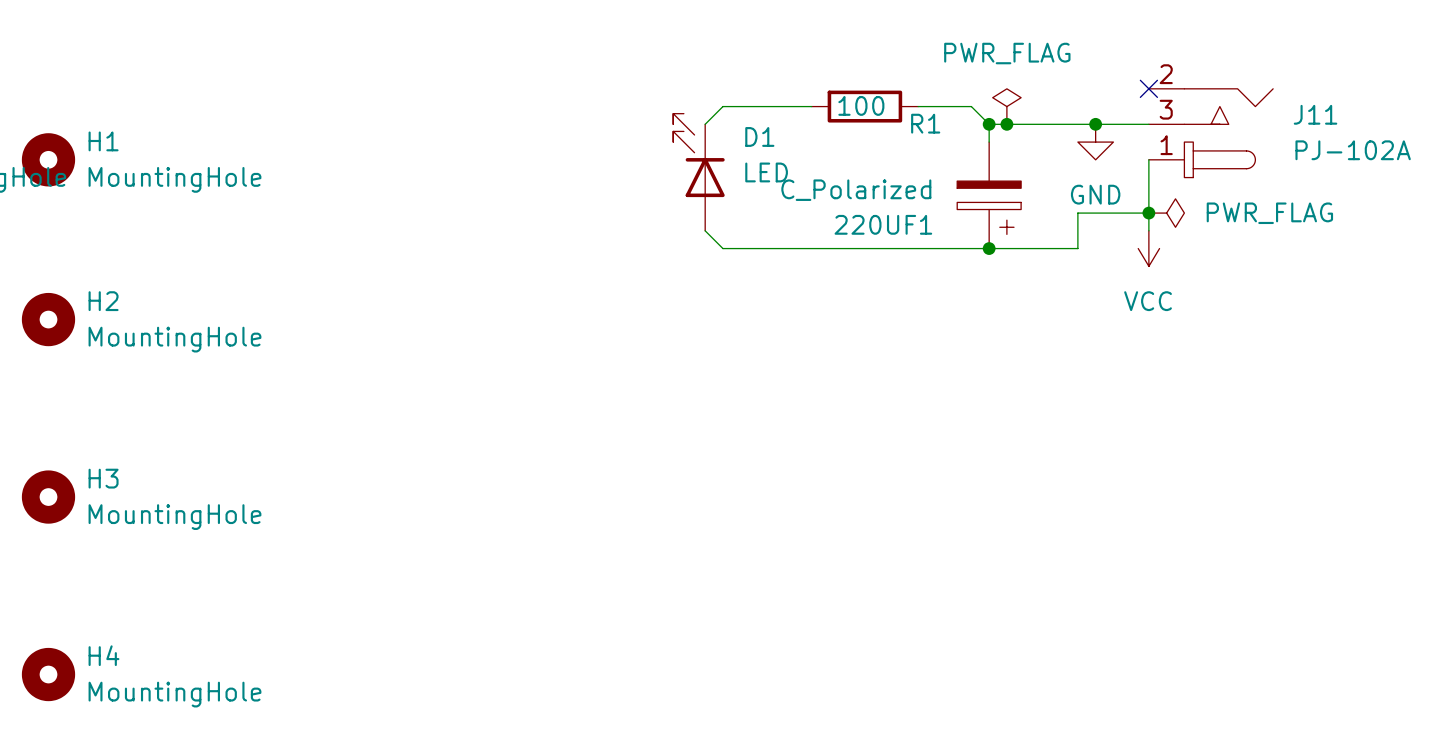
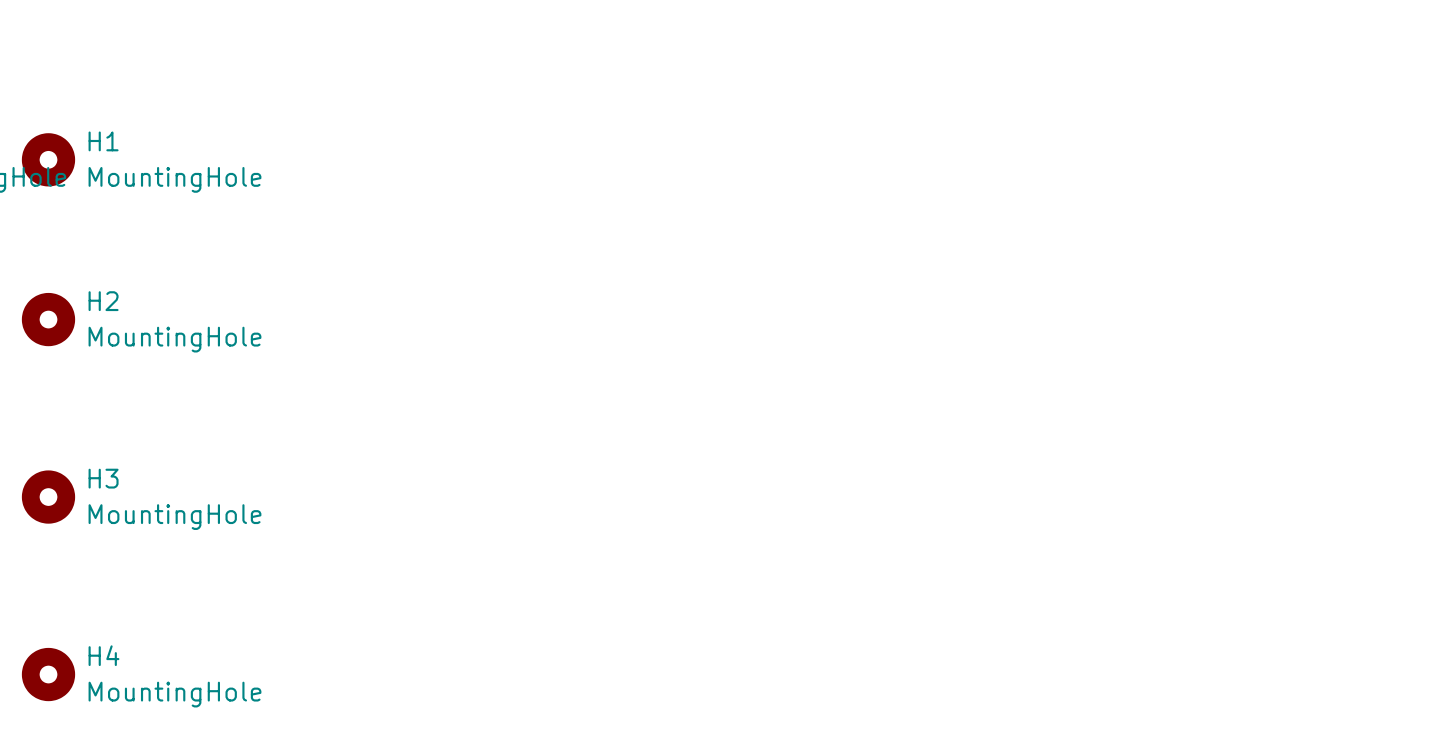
no-connect mark: (1148, 88) -> none
wire: (811, 106) (722, 106) (705, 124) -> none
R1: 100 (864, 106) -> none
wire: (918, 106) (971, 106) (989, 124) -> none
power symbol: PWR_FLAG (1006, 106) -> none
wire: (989, 124) (989, 142) -> none
wire: (989, 124) (1148, 124) -> none
junction: (989, 124) -> none
junction: (1006, 124) -> none
junction: (1095, 124) -> none
J11: PJ-102A (1211, 133) -> none
power symbol: GND (1095, 142) -> none
wire: (1148, 159) (1148, 230) -> none
D1: LED (698, 172) -> none
220UF1: C_Polarized (989, 195) -> none
wire: (1148, 213) (1077, 213) (1077, 248) (722, 248) (705, 230) -> none
junction: (1148, 213) -> none
power symbol: PWR_FLAG (1166, 213) -> none
junction: (989, 248) -> none
power symbol: VCC (1148, 248) -> none

